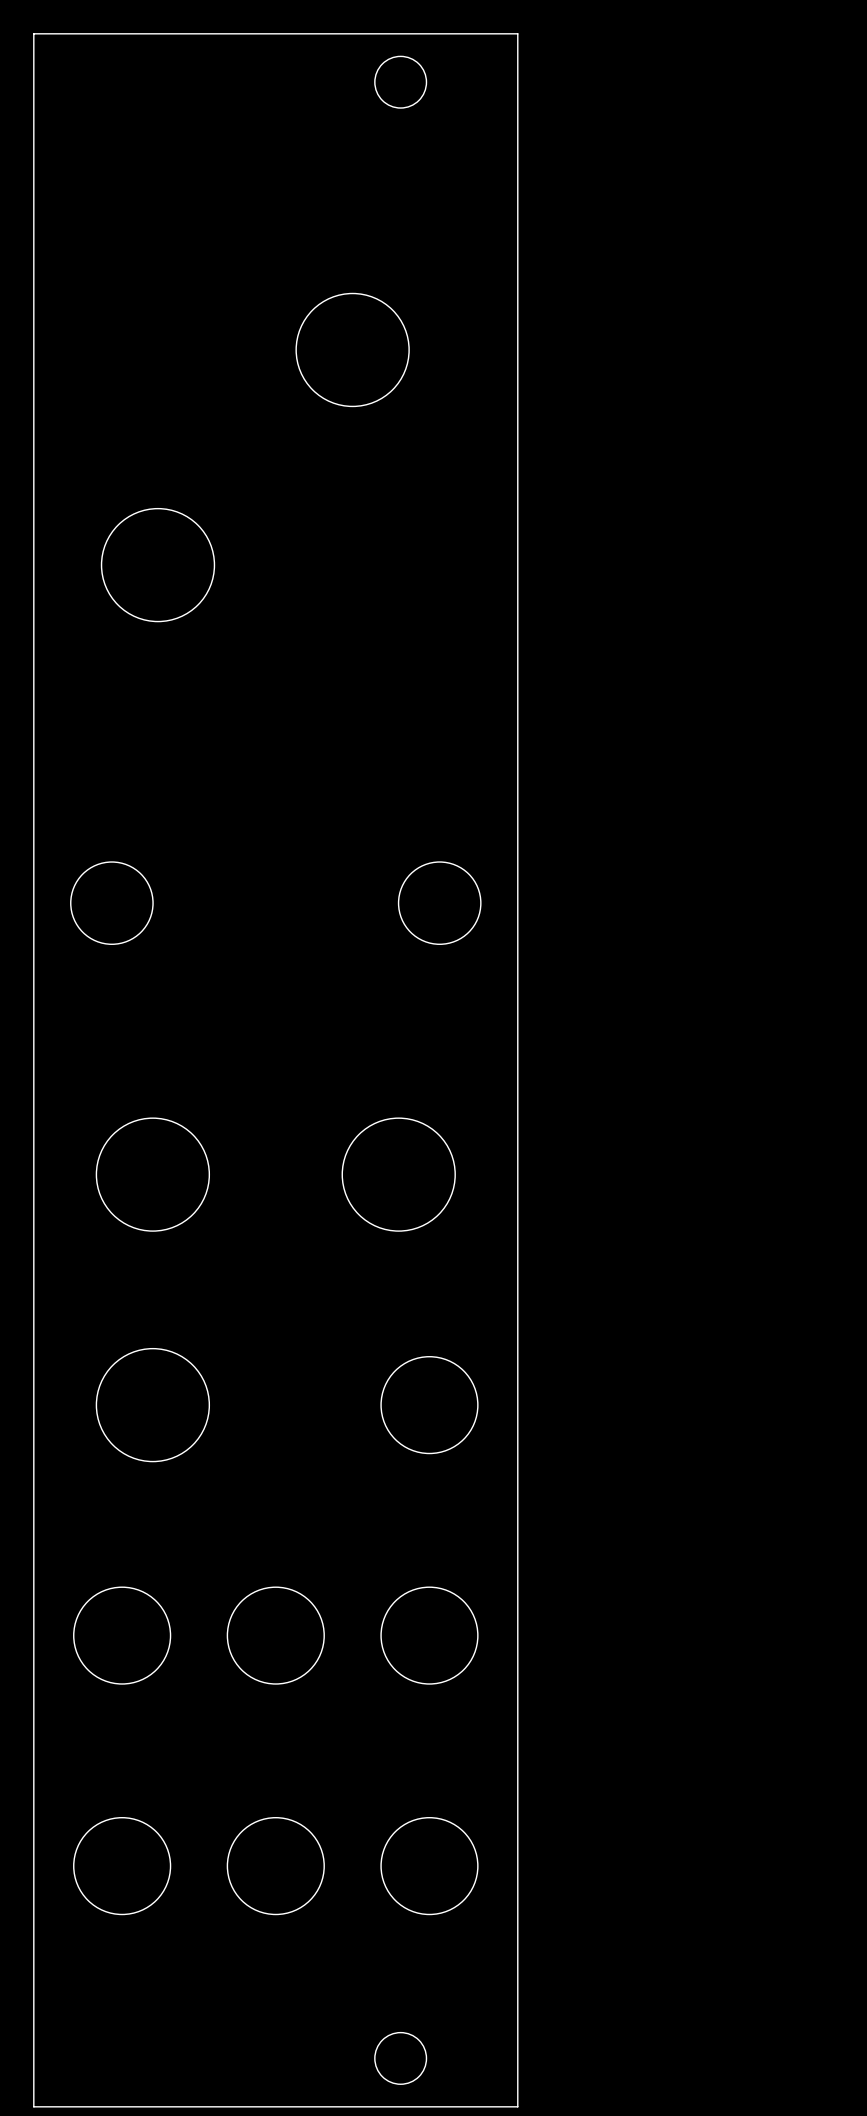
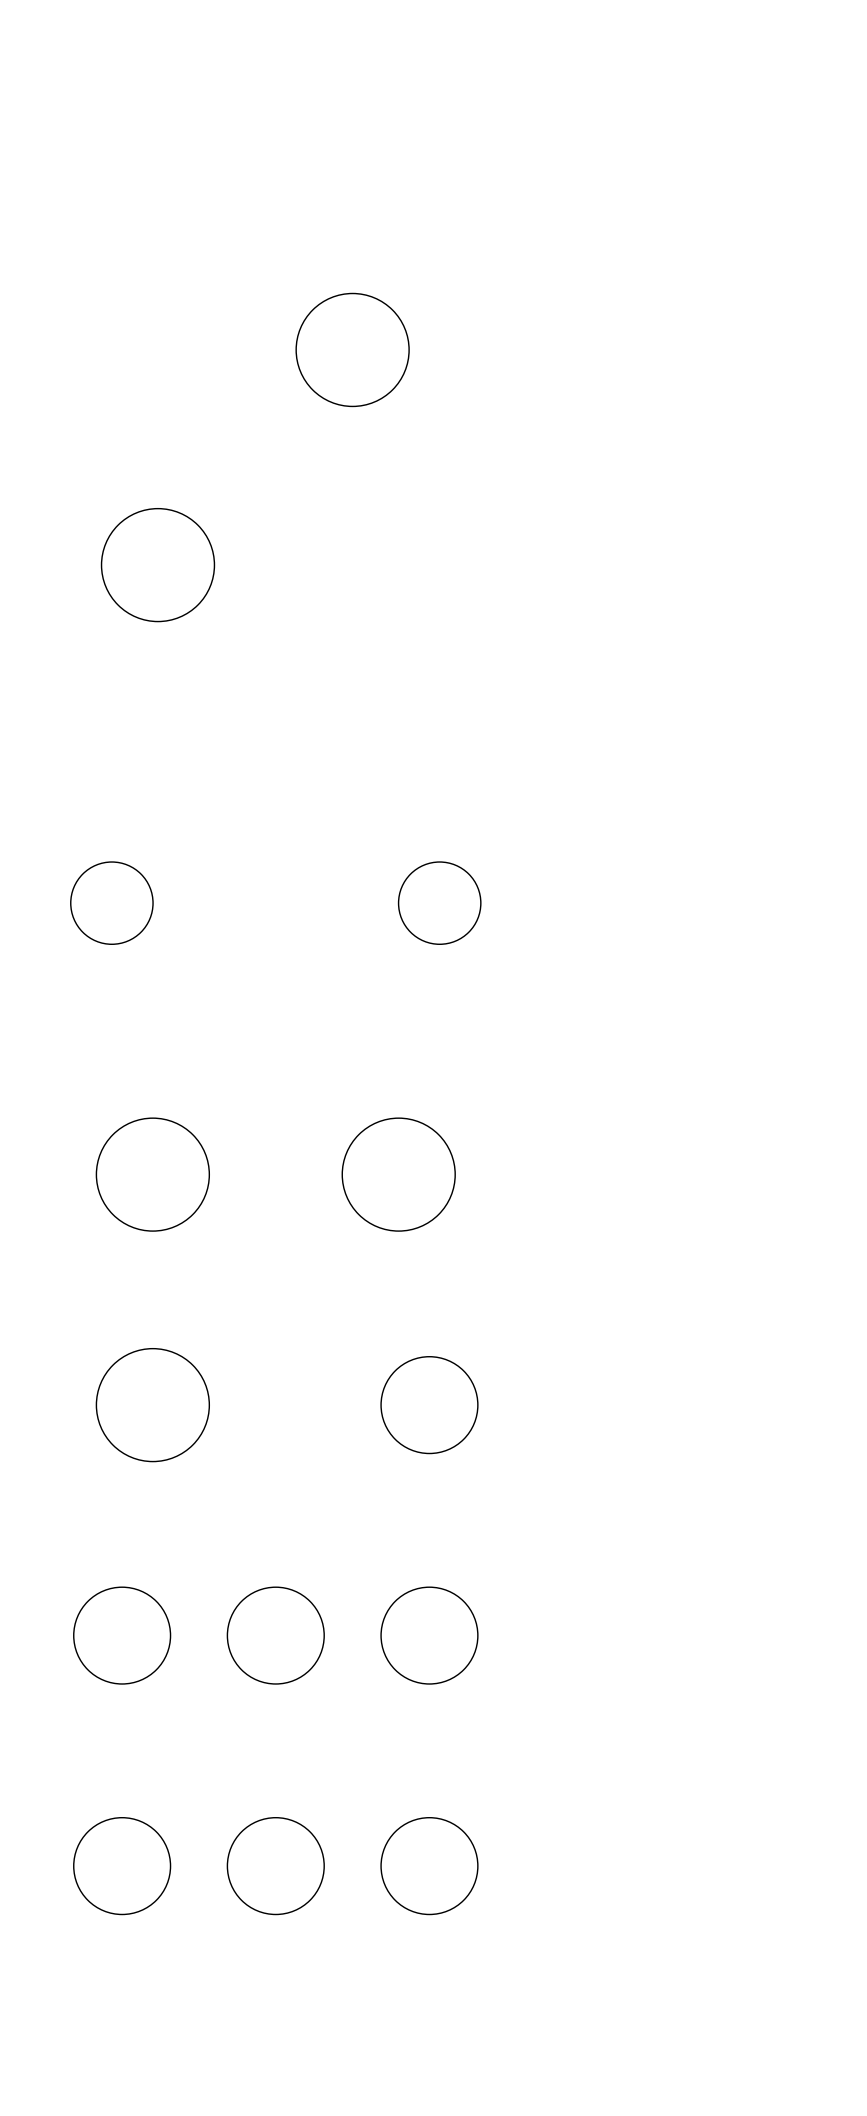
part: (275, 1070) -> none

